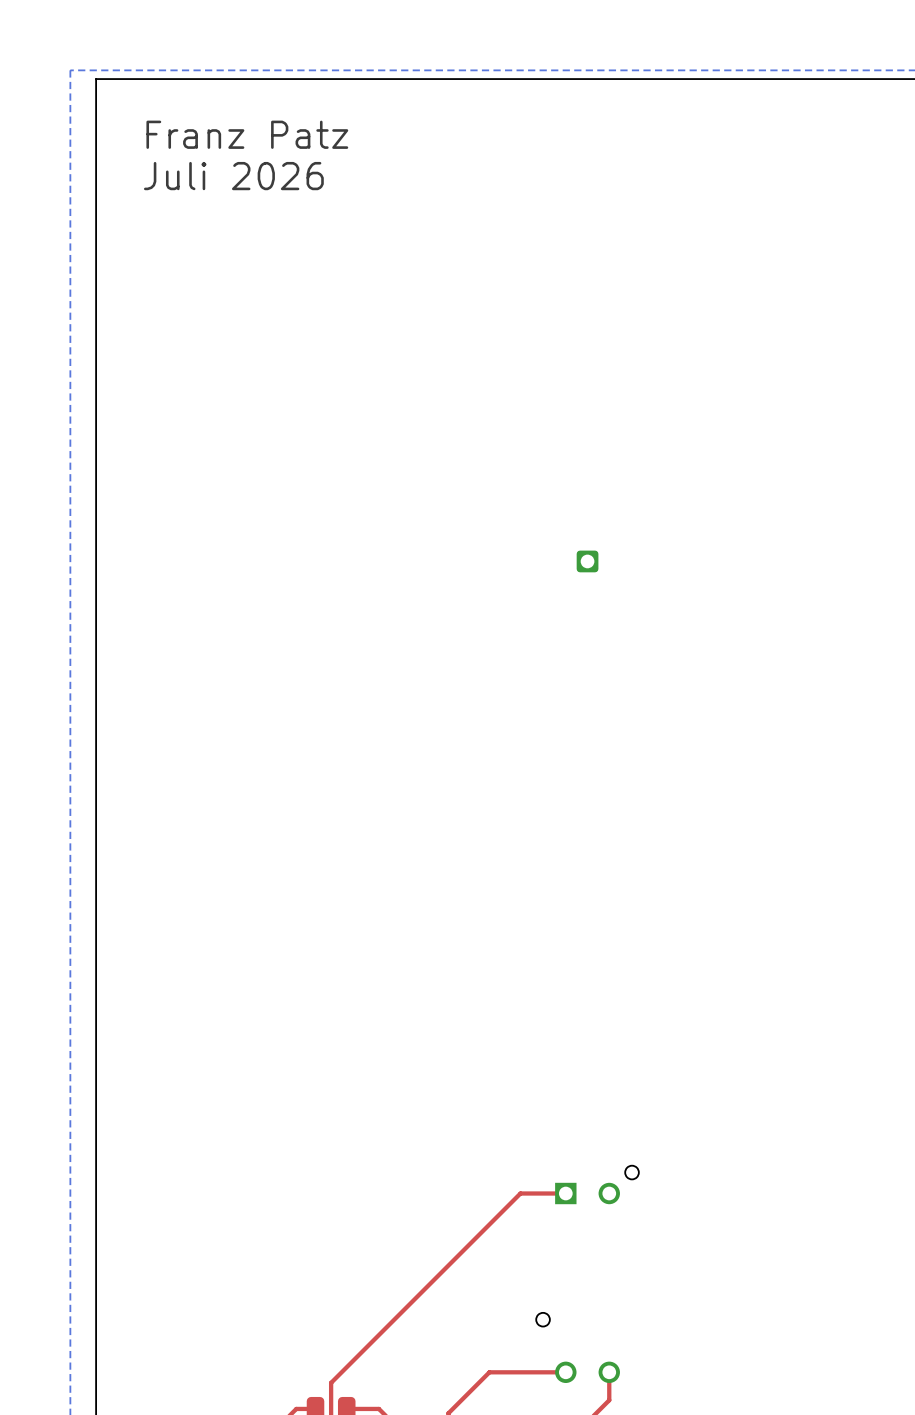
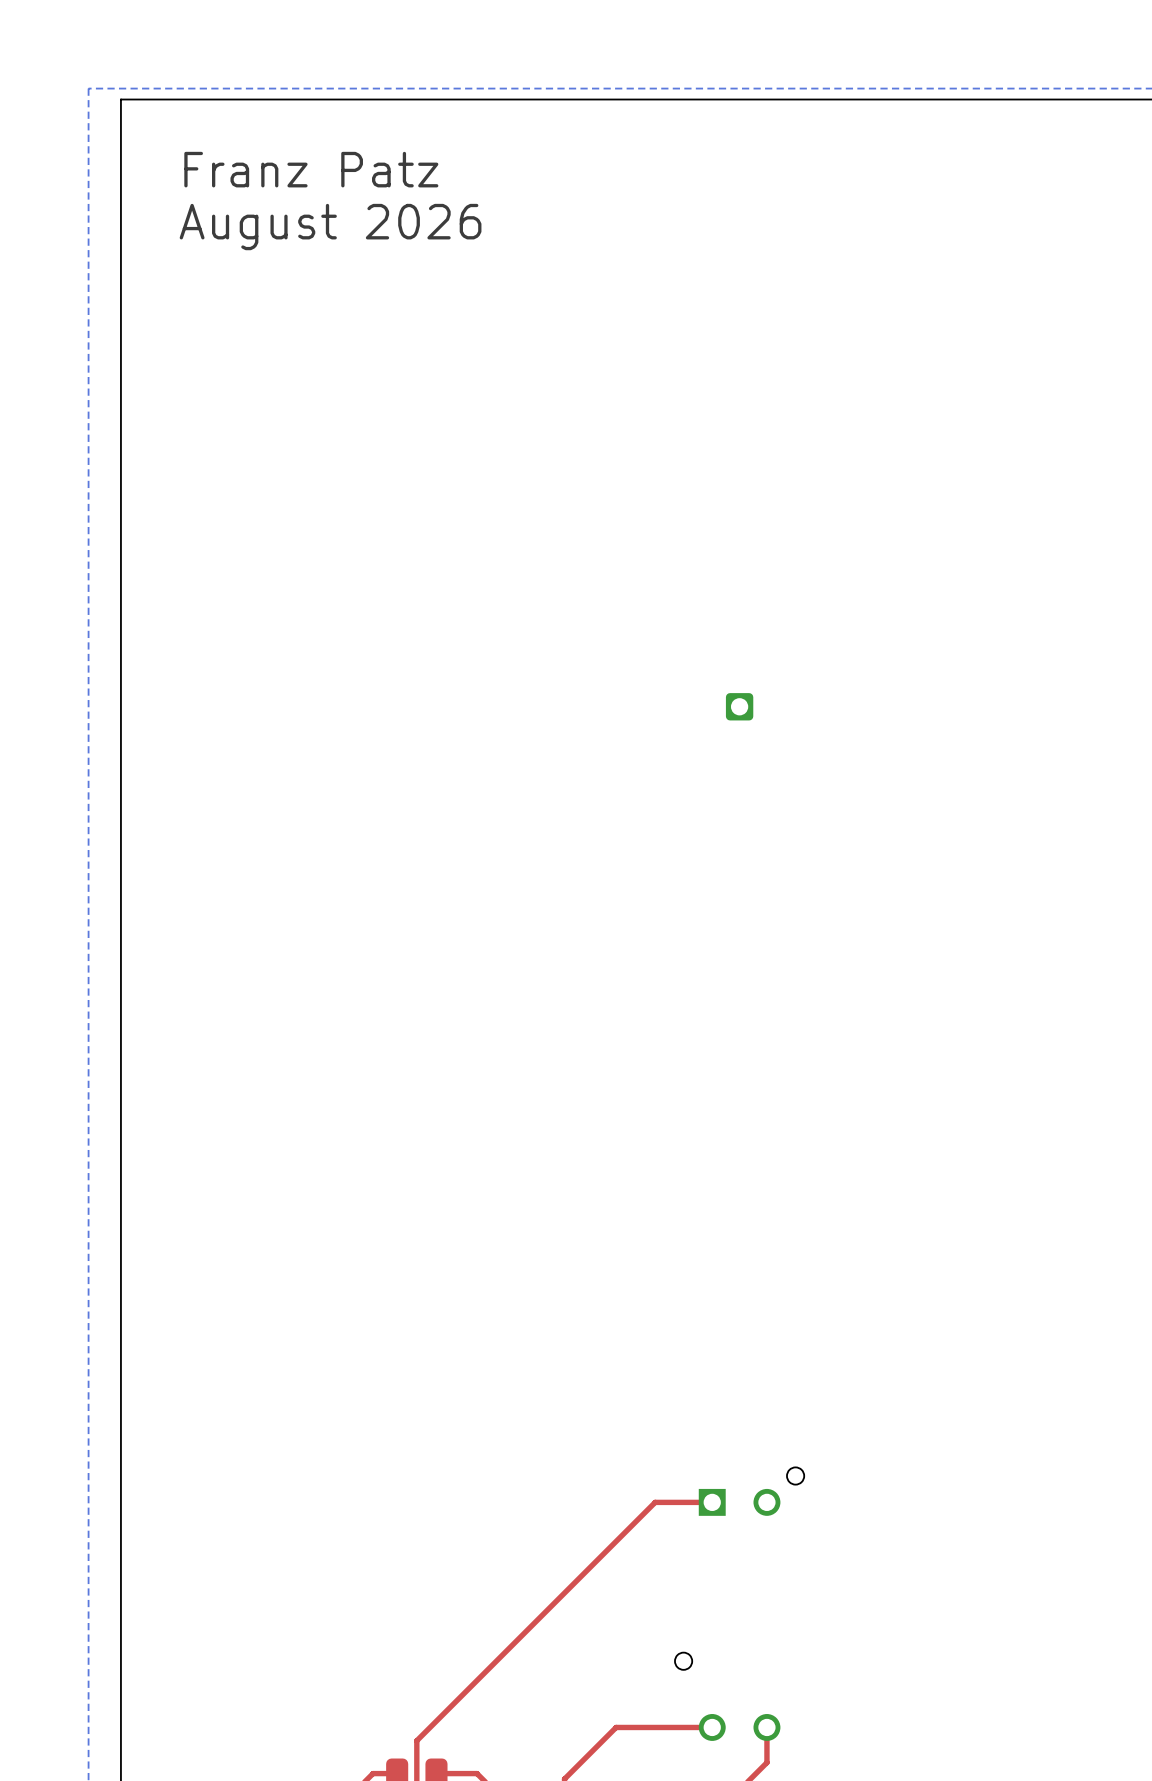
text: Juli 2026 (233, 176) -> August 2026 (330, 227)

